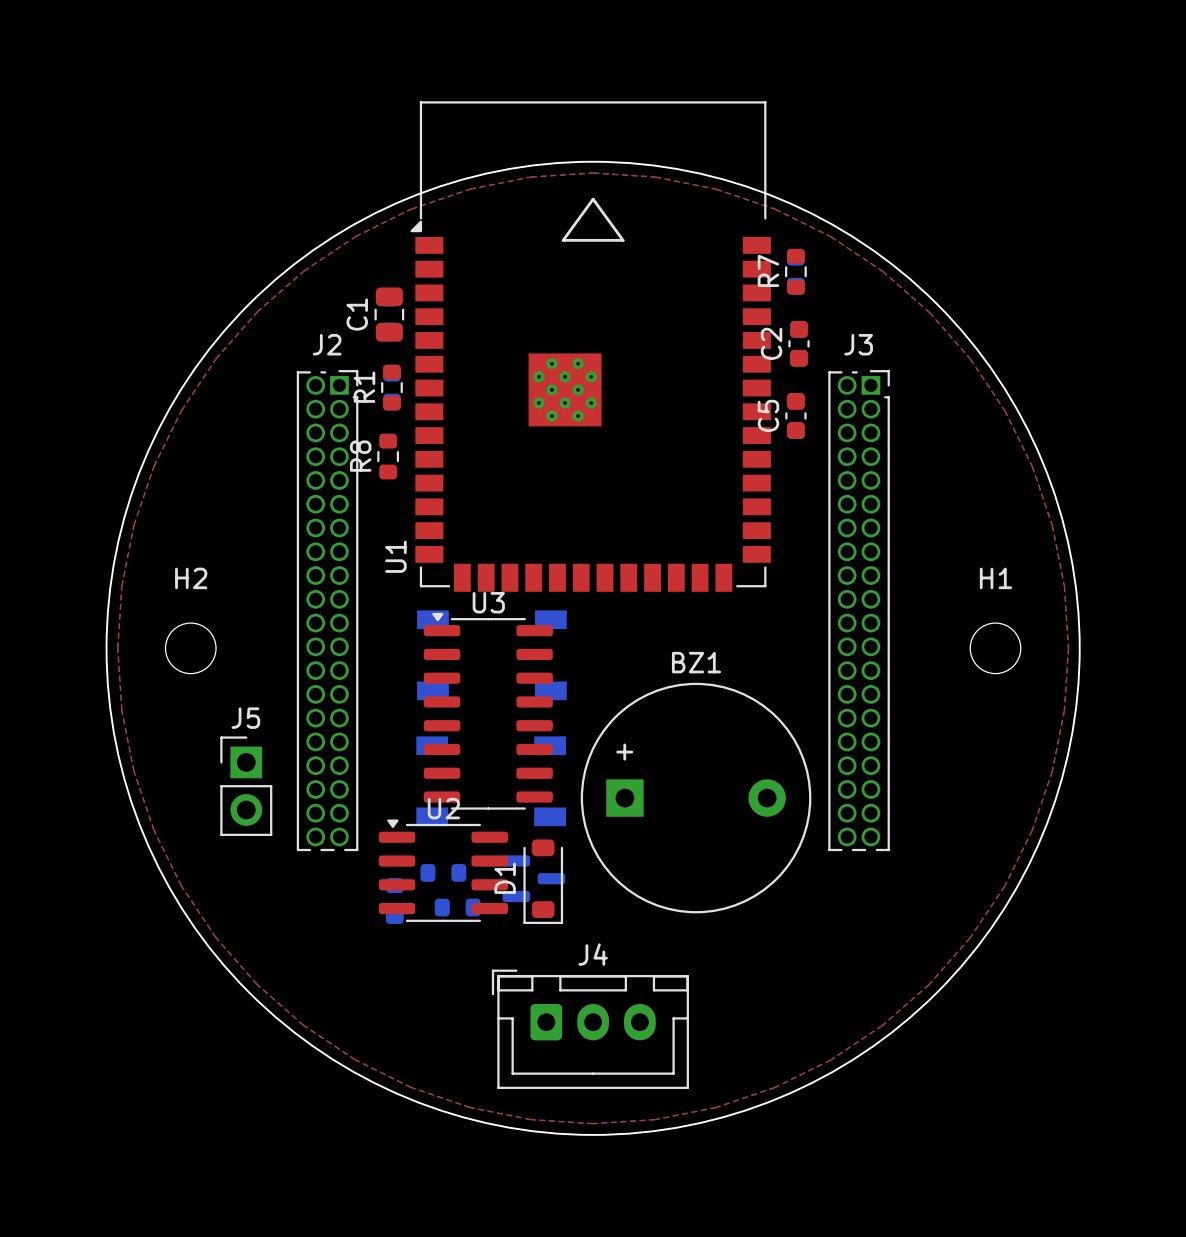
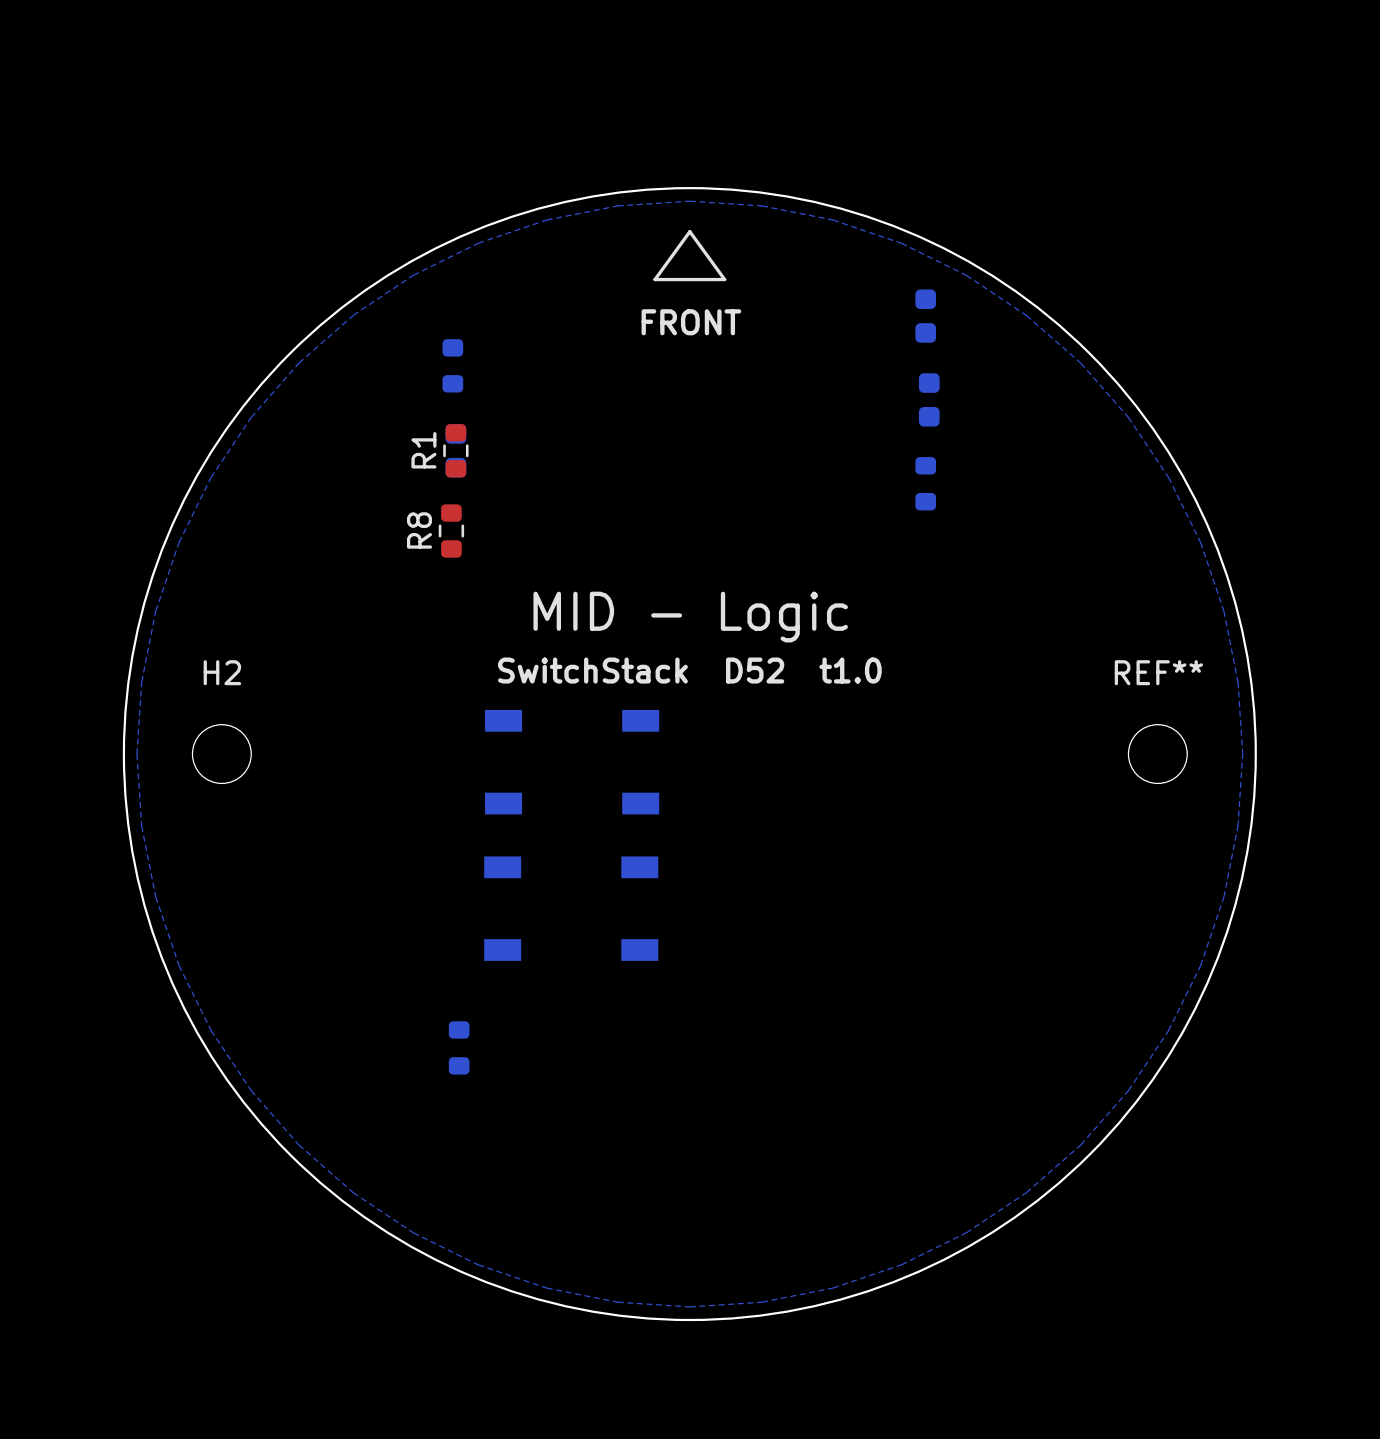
top zone outline: (593, 172) (531, 177) (470, 189) (411, 209) (355, 236) (303, 271) (257, 312) (216, 358) (181, 410) (153, 466) (133, 525) (121, 586) (117, 648) (121, 710) (133, 771) (153, 830) (181, 886) (216, 937) (257, 984) (303, 1025) (355, 1060) (411, 1087) (470, 1107) (531, 1119) (593, 1123) (655, 1119) (716, 1107) (775, 1087) (830, 1060) (882, 1025) (929, 984) (970, 937) (1004, 886) (1032, 830) (1052, 771) (1064, 710) (1068, 648) (1064, 586) (1052, 525) (1032, 466) (1004, 410) (970, 358) (929, 312) (882, 271) (830, 236) (775, 209) (716, 189) (655, 177) (593, 172) -> none
R7: (795, 271) -> none
text: none -> FRONT (691, 322)
C1: (389, 314) -> none
C2: (798, 343) -> none
U1: (590, 346) -> none
C5: (795, 415) -> none
text: none -> MID - Logic (690, 617)
text: none -> SwitchStack D52 t1.0 (689, 670)
H1 name: H1 (995, 578) -> REF** (1158, 672)
J2: (327, 610) -> none
J3: (859, 610) -> none
U3: (488, 711) -> none
J5: (246, 786) -> none
BZ1: (696, 798) -> none
U2: (443, 870) -> none
part: (443, 872) -> none
part: (533, 878) -> none
D1: (543, 881) -> none
part: (457, 907) -> none
J4: (590, 1029) -> none

